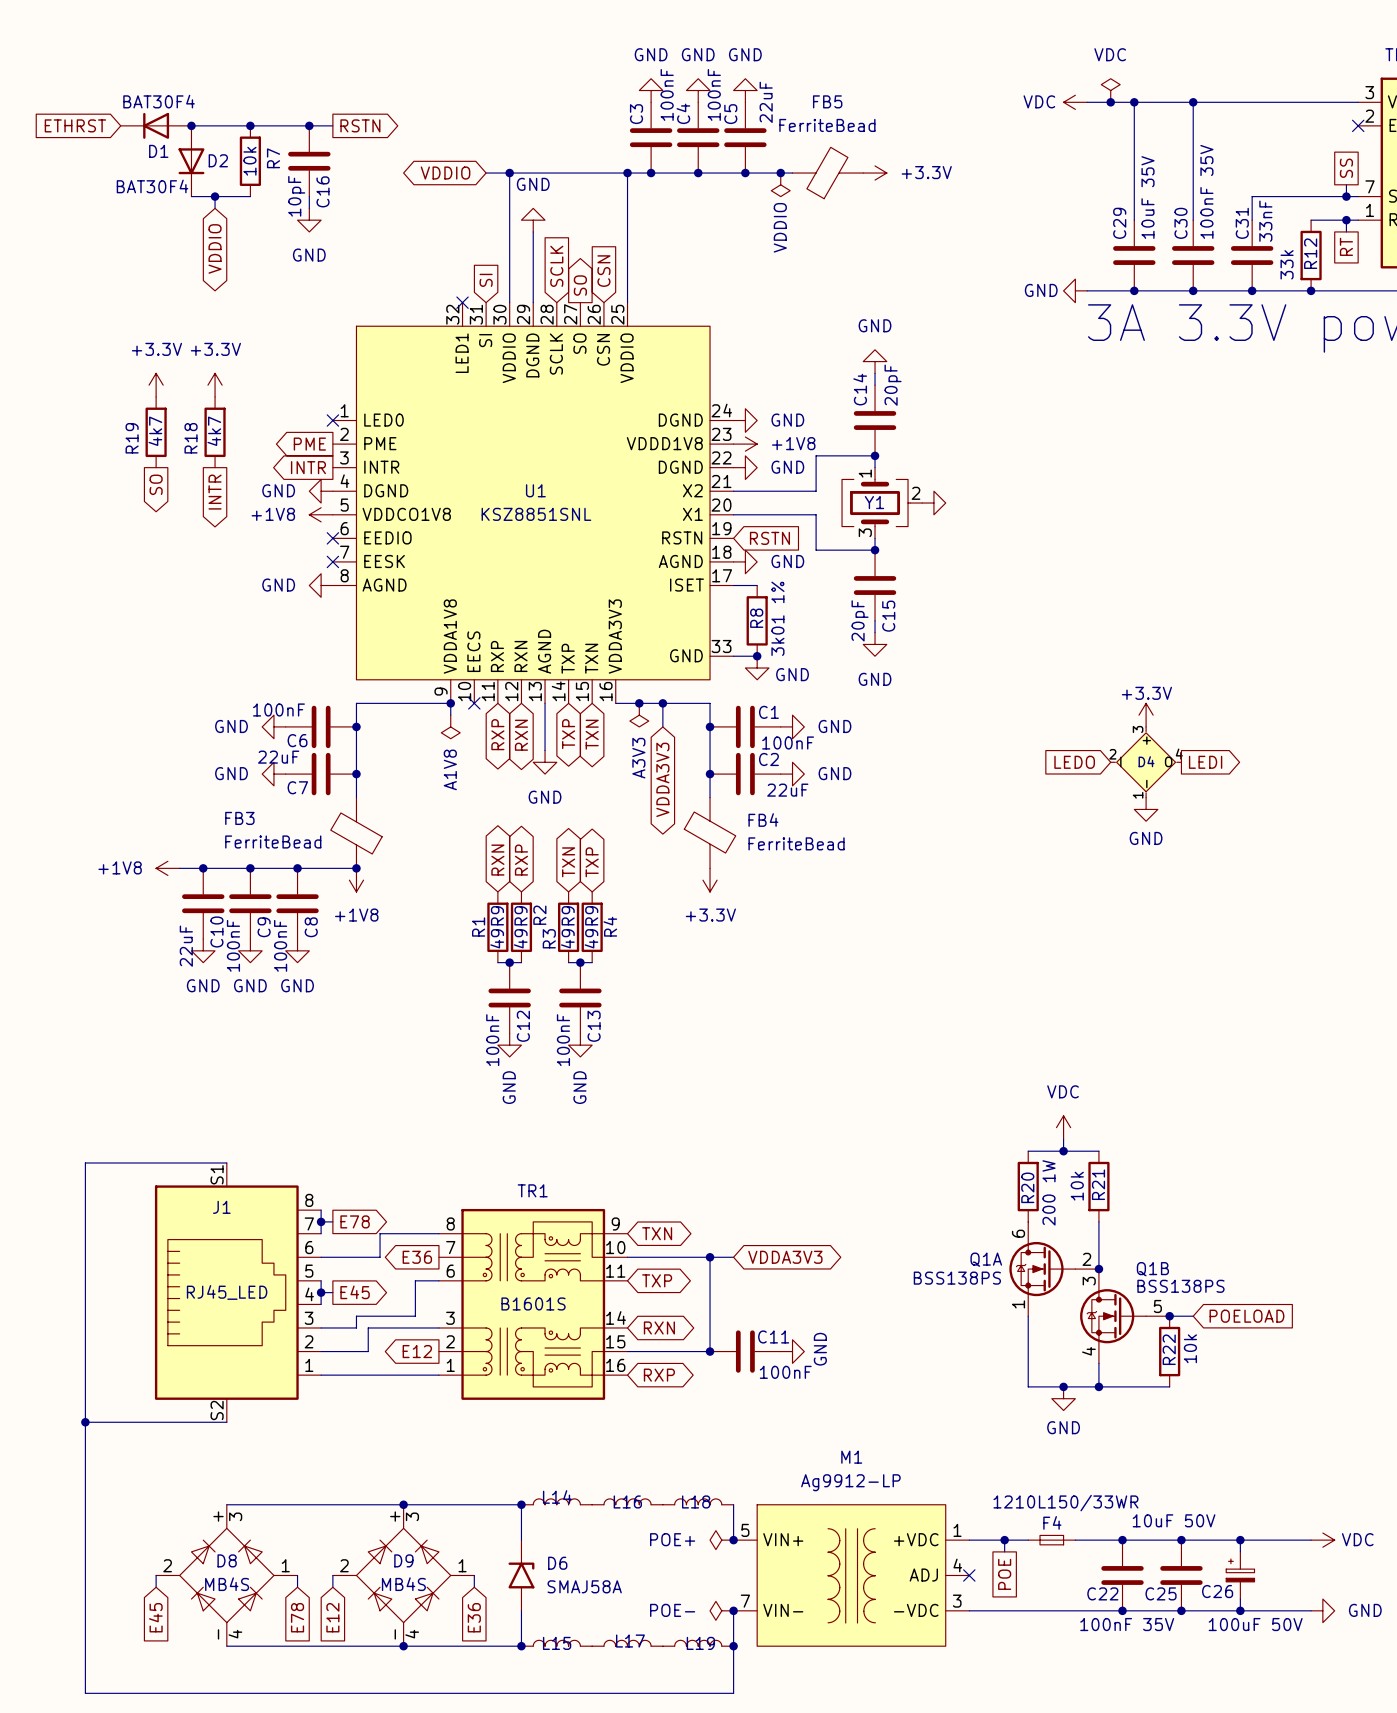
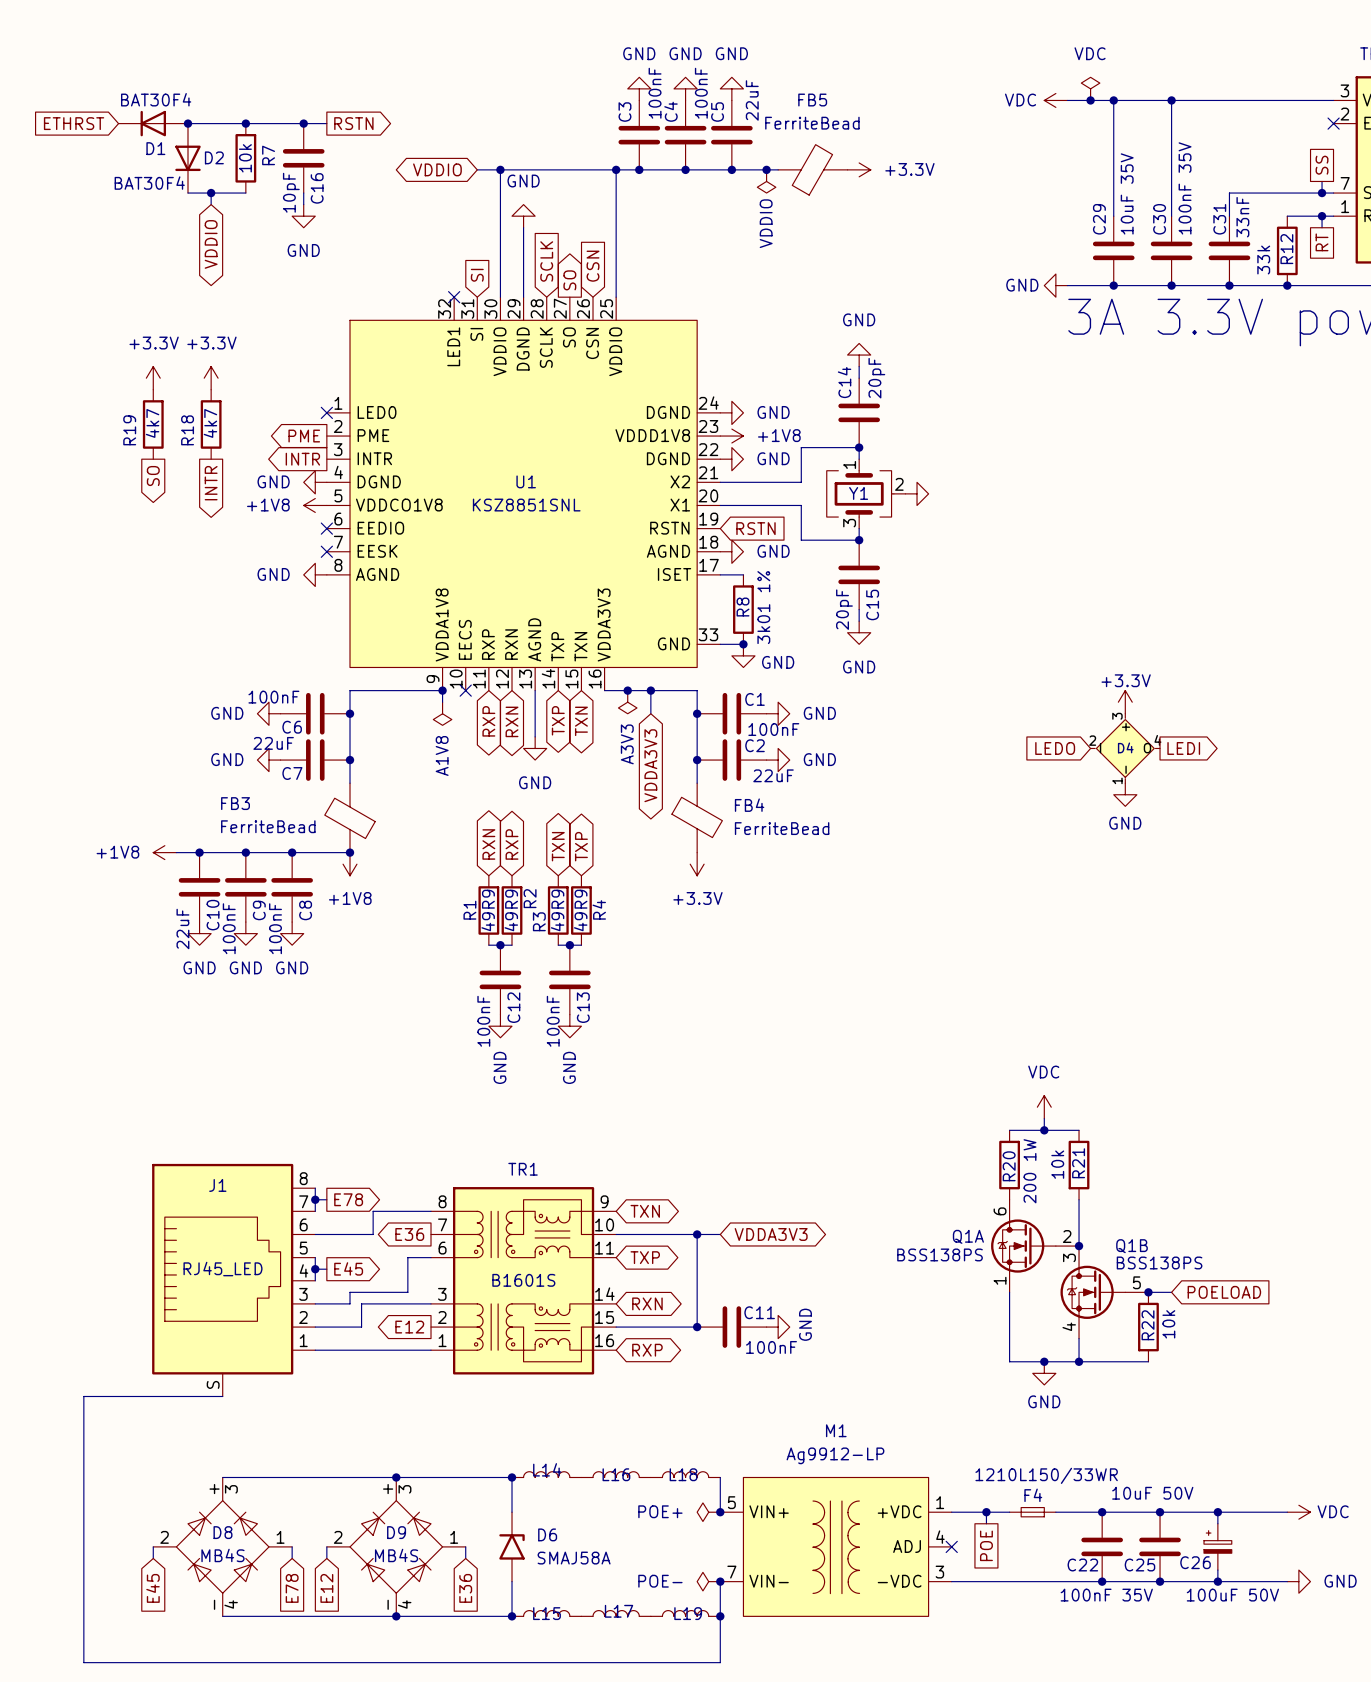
J1 symbol: [154, 1162, 322, 1423] -> [152, 1163, 316, 1397]
wire: (226, 1162) (85, 1162) (85, 1422) -> none
junction: (85, 1422) -> none

